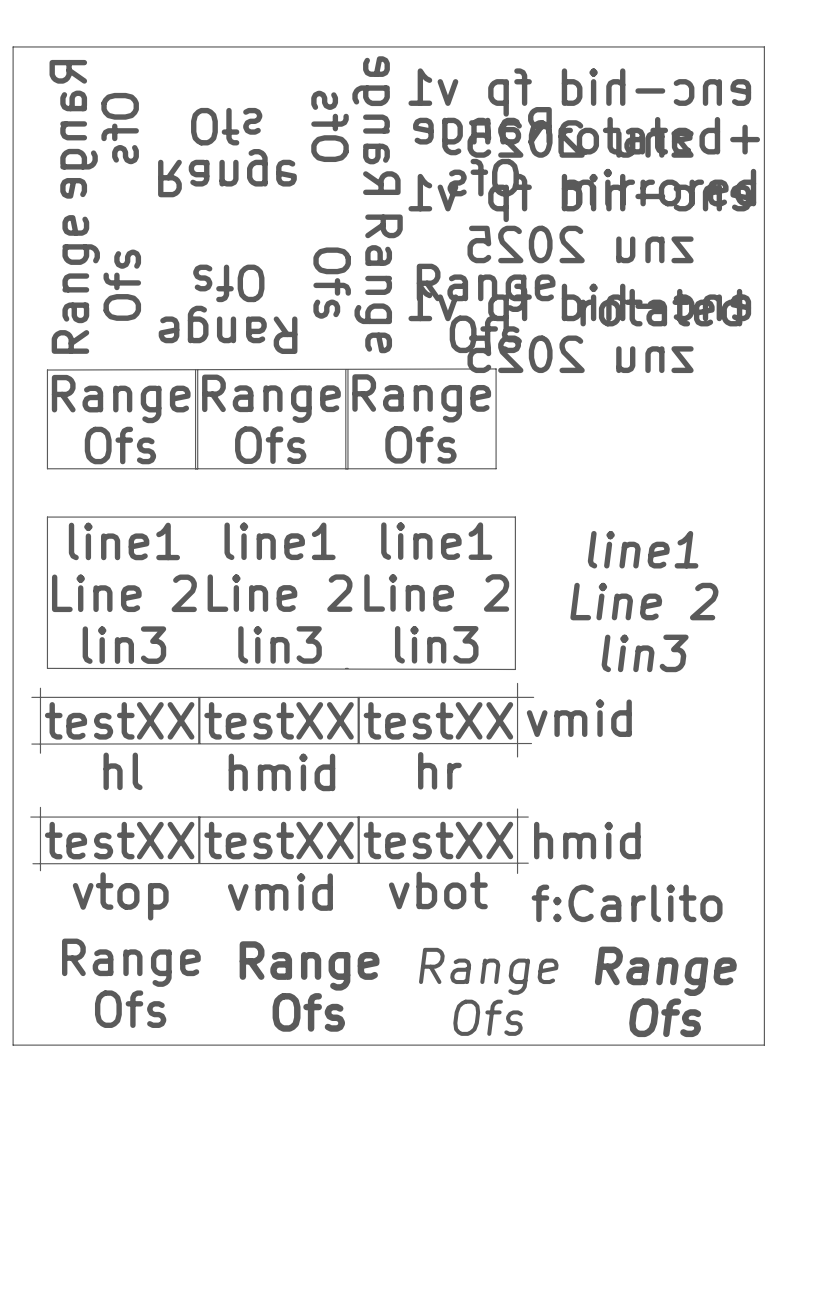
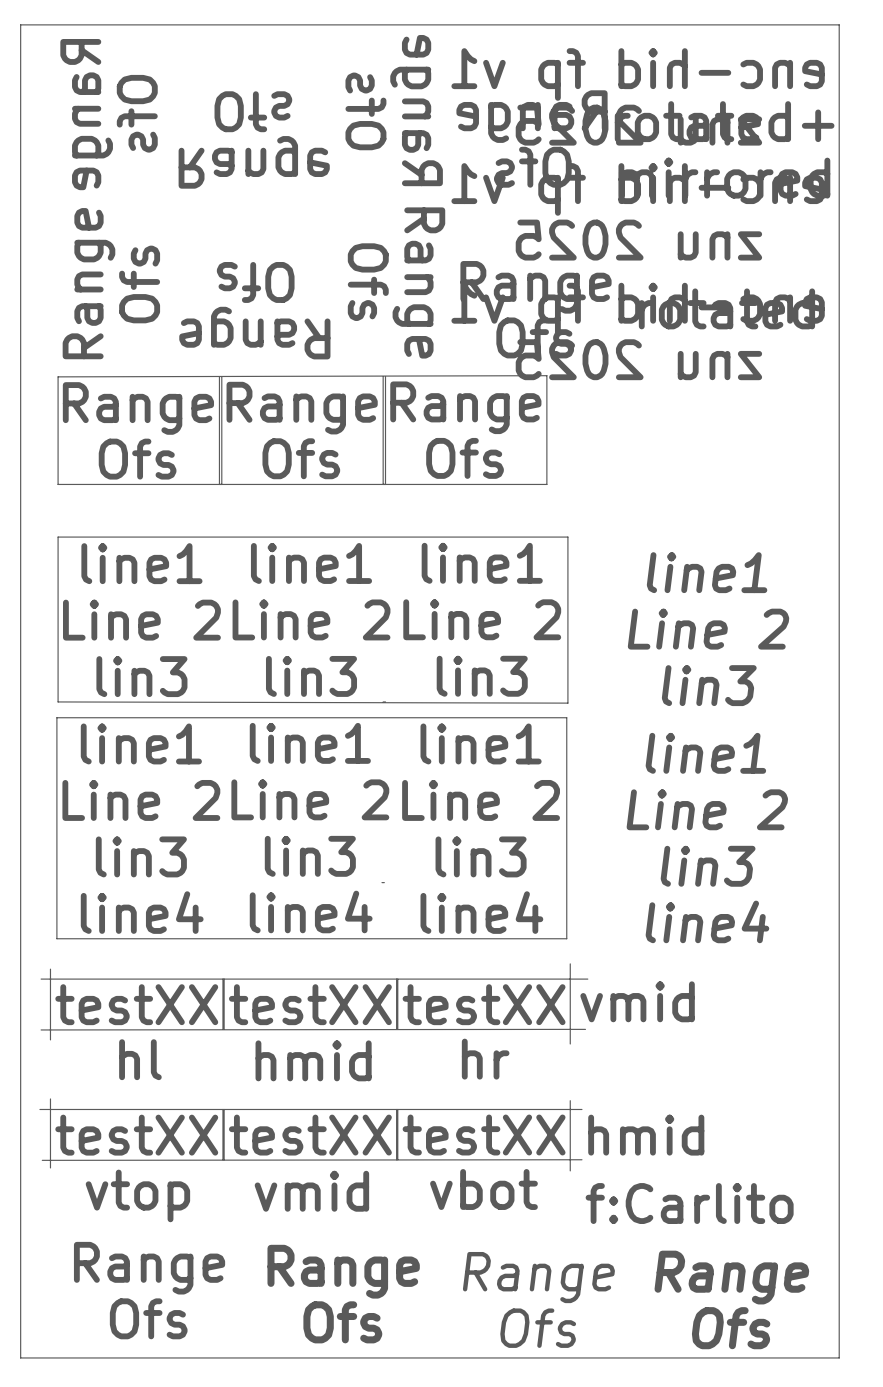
line: none -> (56, 717) (566, 717) (566, 938) (56, 938) (56, 717)
line: (517, 683) (517, 756) -> (570, 963) (570, 1043)
line: (40, 688) (40, 753) -> (50, 969) (50, 1039)
line: (31, 697) (533, 697) -> (41, 979) (587, 979)
line: (198, 697) (198, 743) -> (222, 979) (222, 1029)
line: (199, 697) (199, 743) -> (224, 979) (224, 1029)
line: (358, 697) (358, 743) -> (396, 979) (396, 1029)
line: (359, 697) (359, 743) -> (397, 979) (397, 1029)
text: none -> line1 (141, 743)
text: none -> line1 (310, 743)
text: none -> line1 (481, 743)
text: none -> line1 (705, 753)
text: vmid (579, 718) -> none
text: testXX (119, 720) -> none
text: testXX (279, 720) -> none
text: testXX (438, 720) -> none
line: (531, 743) (31, 744) -> (585, 1029) (41, 1029)
text: none -> Line 2 (141, 800)
text: none -> Line 2 (481, 800)
text: none -> Line 2 (707, 809)
text position: hr (439, 770) -> hr (485, 1059)
text position: hl (123, 771) -> hl (140, 1059)
text: hmid (281, 772) -> Line 2 (310, 799)
line: (40, 807) (40, 870) -> (50, 1098) (50, 1167)
line: (517, 808) (517, 873) -> (570, 1100) (570, 1170)
text: none -> lin3 (310, 856)
text: none -> lin3 (481, 856)
line: (30, 817) (528, 817) -> (39, 1109) (581, 1109)
line: (198, 817) (198, 863) -> (222, 1109) (222, 1159)
line: (199, 817) (199, 863) -> (224, 1109) (224, 1159)
line: (358, 817) (358, 863) -> (396, 1109) (396, 1159)
line: (359, 817) (359, 863) -> (397, 1109) (397, 1159)
text: none -> lin3 (708, 866)
line: none -> (381, 882) (384, 882)
text: testXX (119, 840) -> lin3 (141, 856)
text: testXX (279, 840) -> none
text: testXX (438, 840) -> none
text: hmid (587, 840) -> none
text: none -> line4 (142, 912)
text: none -> line4 (311, 911)
text: none -> line4 (481, 912)
line: (528, 863) (32, 863) -> (581, 1159) (42, 1160)
text: none -> line4 (707, 921)
text position: vbot (438, 890) -> vbot (483, 1189)
text: vmid (280, 892) -> none
text position: vtop (120, 896) -> vtop (137, 1195)
text position: f:Carlito (627, 903) -> f:Carlito (689, 1203)
text: none -> vmid (637, 1001)
text: none -> testXX (136, 1004)
text: none -> testXX (310, 1004)
text: none -> testXX (484, 1004)
text: Range (131, 962) -> none
text: Range (309, 965) -> none
text: Range (488, 971) -> none
text: Range (665, 971) -> none
text: none -> hmid (313, 1060)
text: Ofs (130, 1009) -> none
text: Ofs (308, 1012) -> none
text: Ofs (488, 1017) -> none
text: Ofs (665, 1017) -> none
line: (13, 1045) (764, 1045) -> (20, 1112) (20, 1357) (839, 1357) (839, 1112)
text: none -> testXX (136, 1135)
text: none -> testXX (310, 1135)
text: none -> testXX (484, 1135)
text: none -> hmid (646, 1135)
text: none -> vmid (311, 1191)
text: none -> Range (149, 1268)
text: none -> Range (343, 1271)
text: none -> Range (538, 1277)
text: none -> Range (731, 1277)
text: none -> Ofs (148, 1318)
text: none -> Ofs (342, 1322)
text: none -> Ofs (538, 1328)
text: none -> Ofs (731, 1328)

